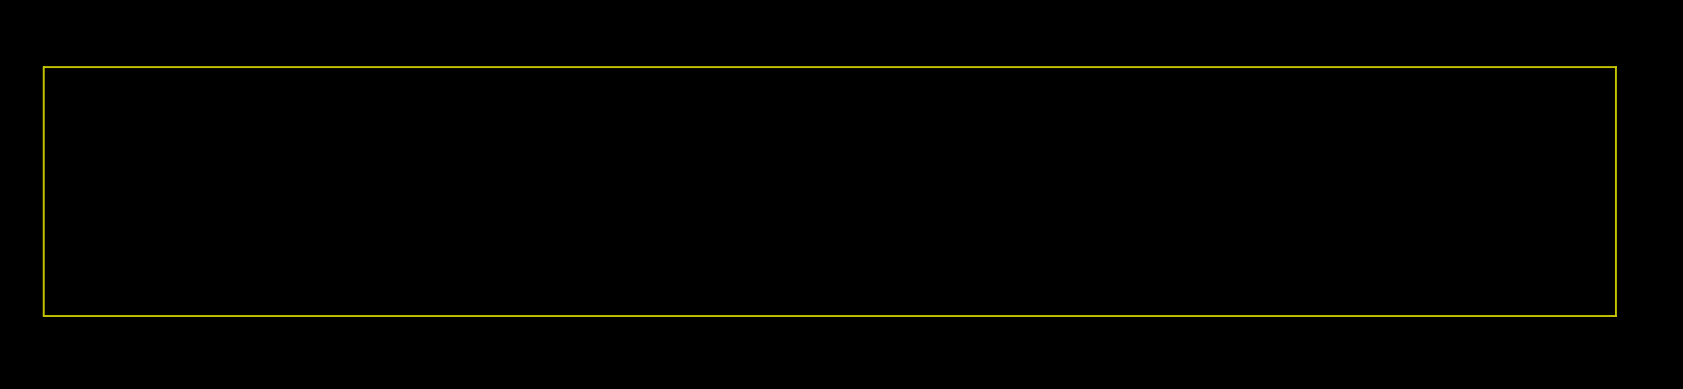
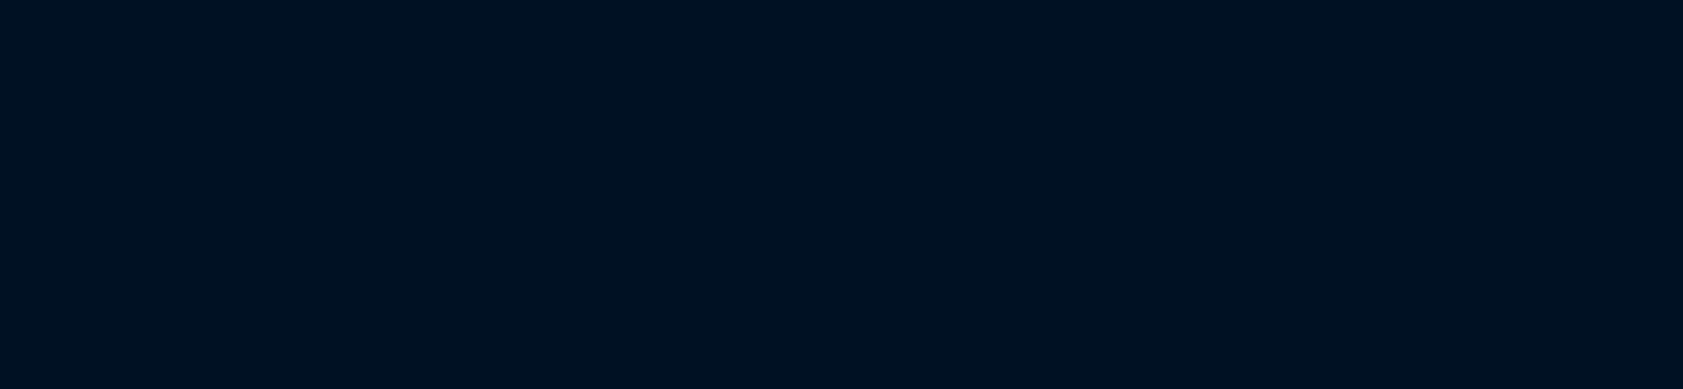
board edge: (43, 67) (1615, 67) (1615, 316) (43, 316) (43, 67) -> none

